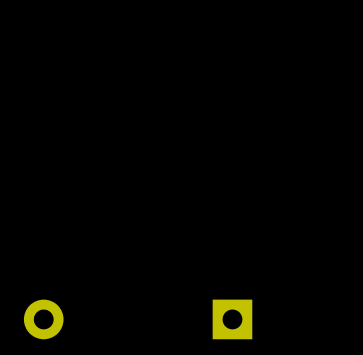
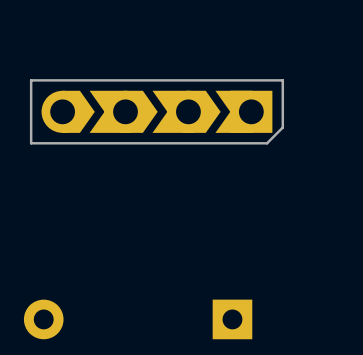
part: none -> (156, 111)

